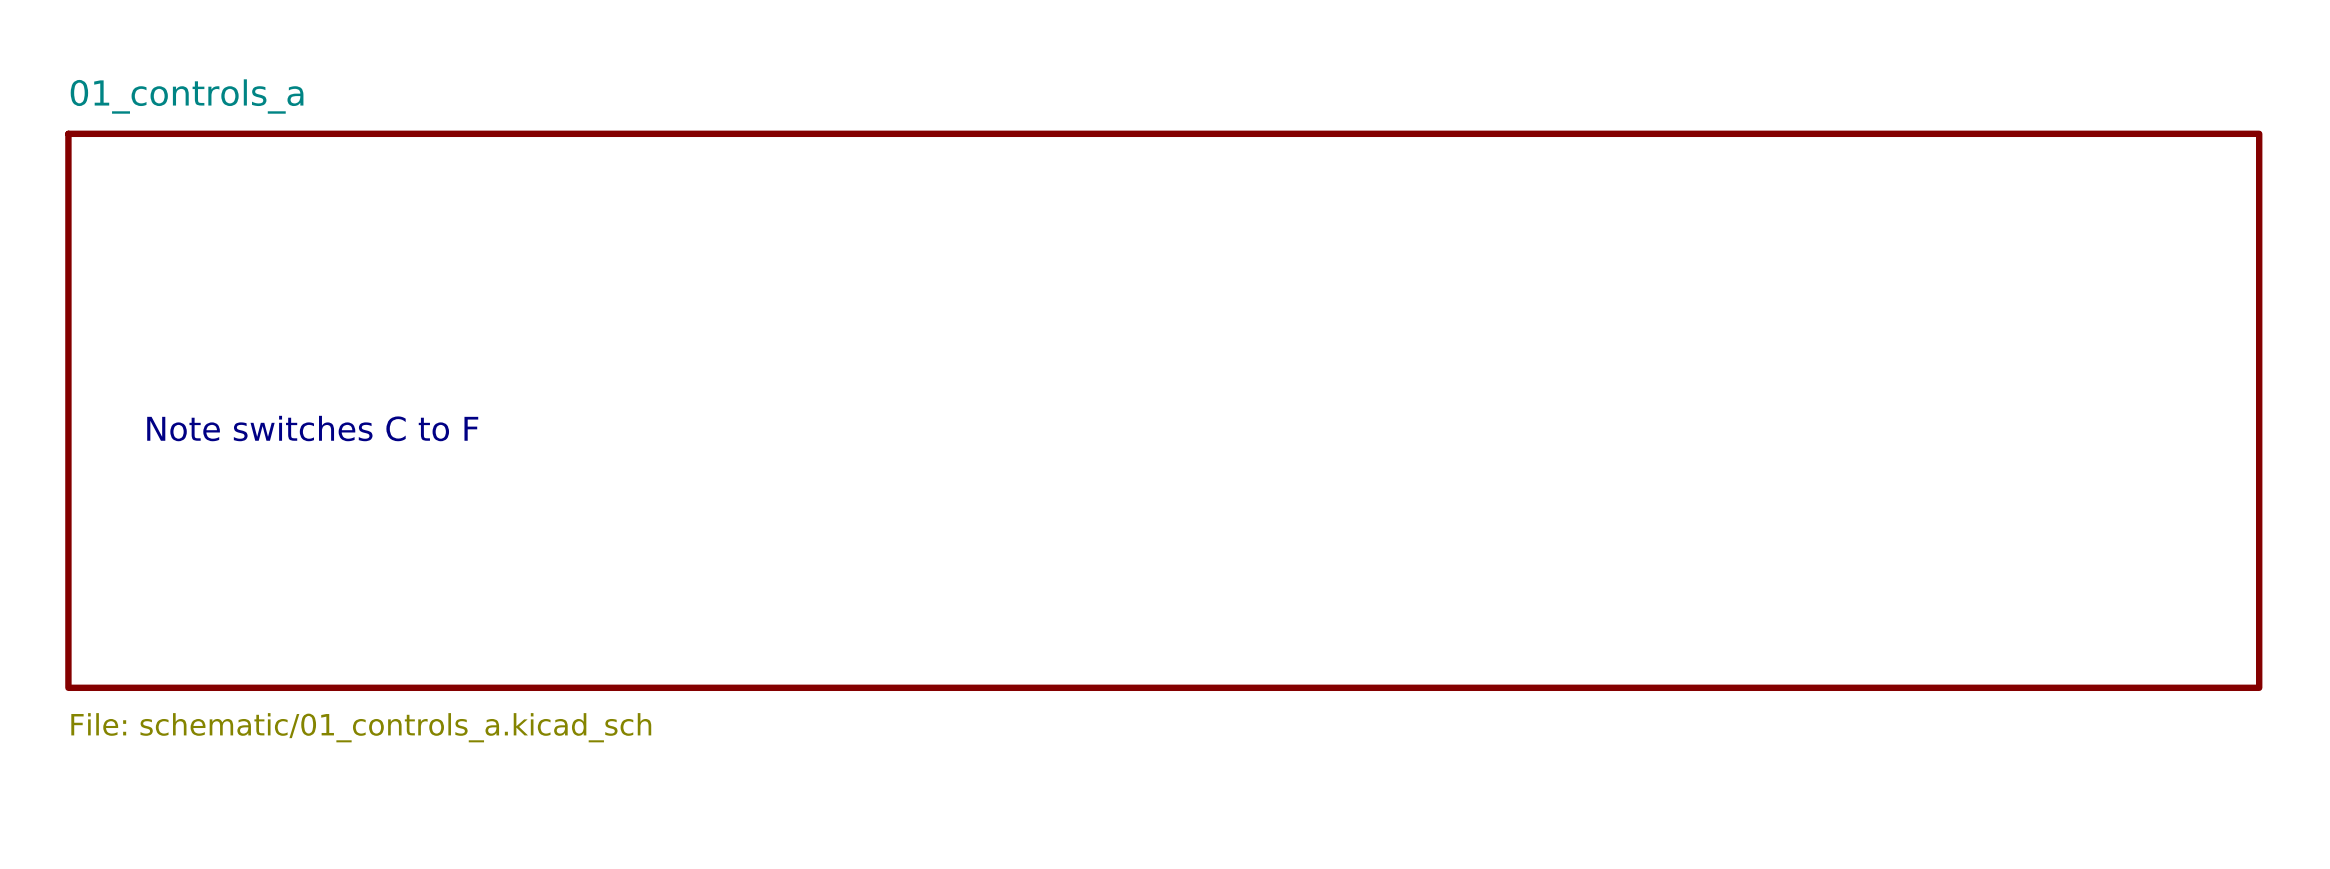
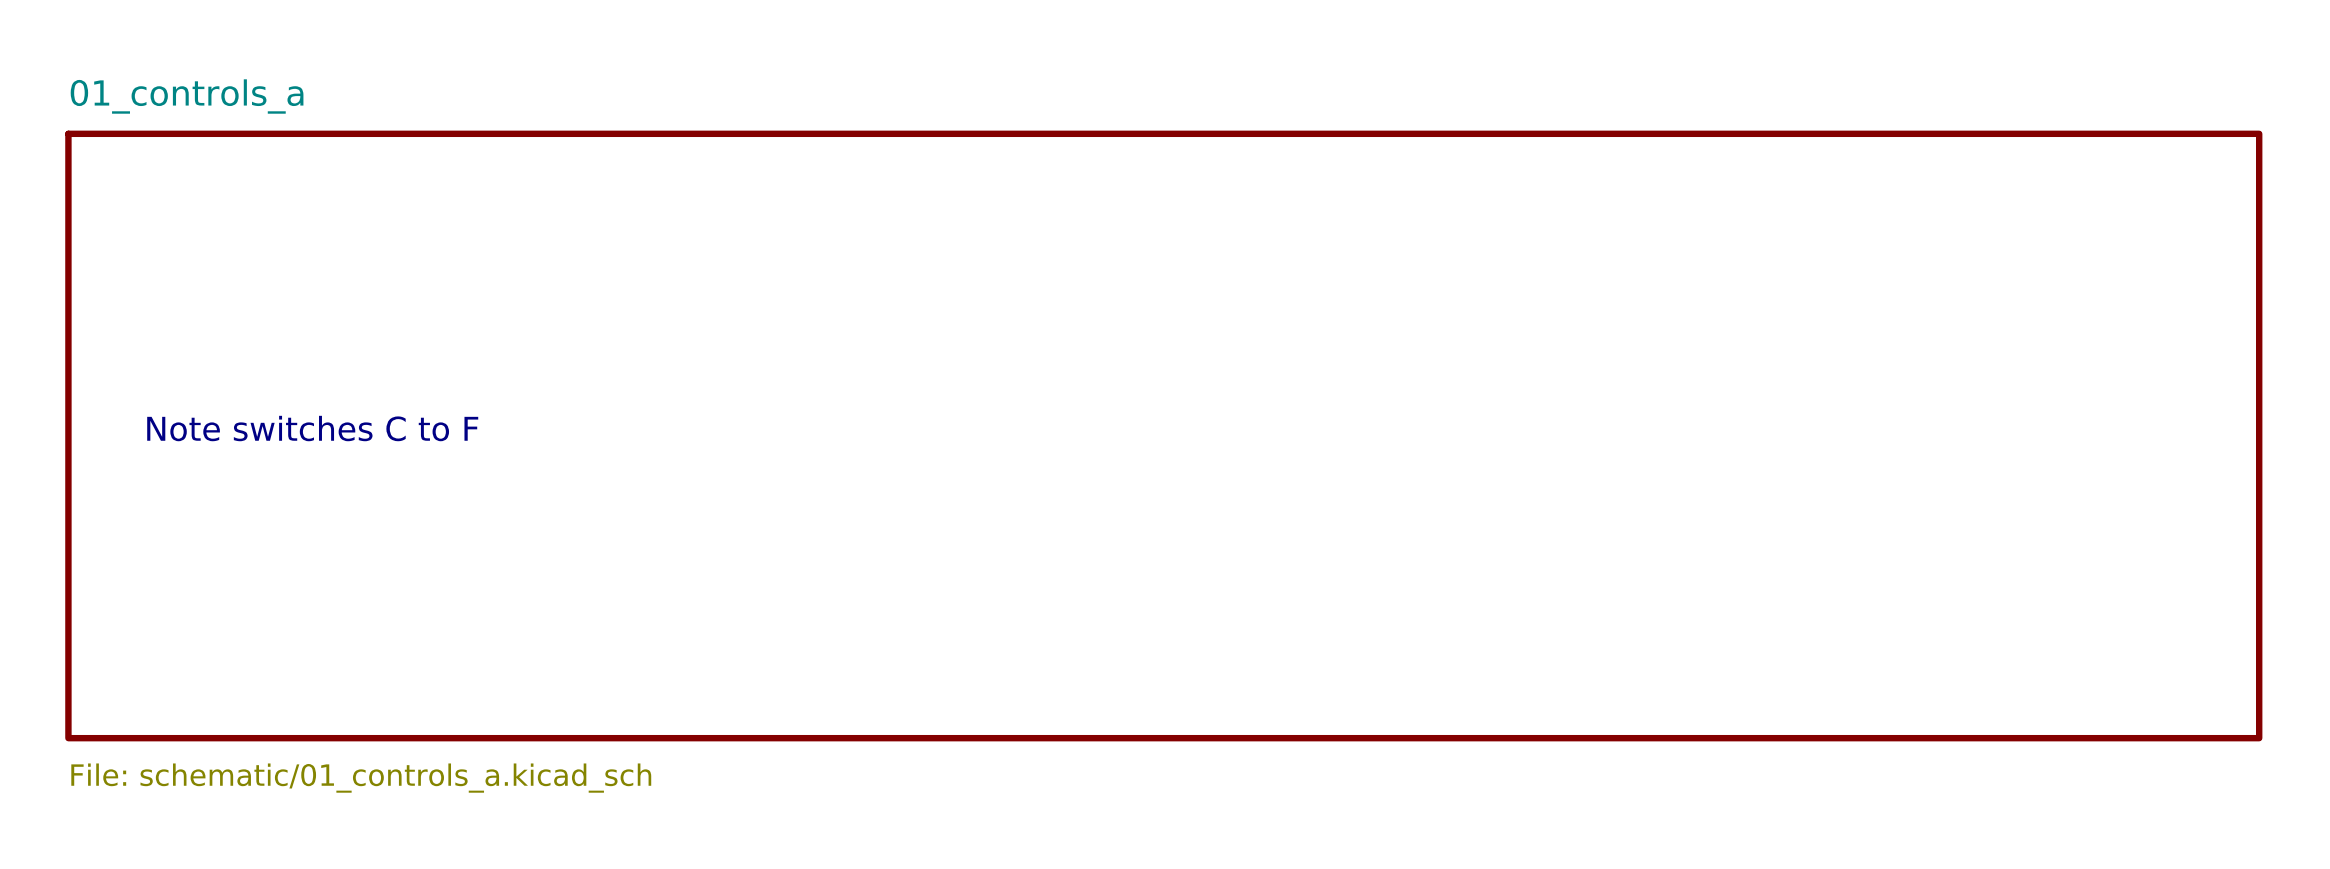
sheet 01_controls_a shape: [65, 130, 2263, 692] -> [65, 130, 2263, 742]

